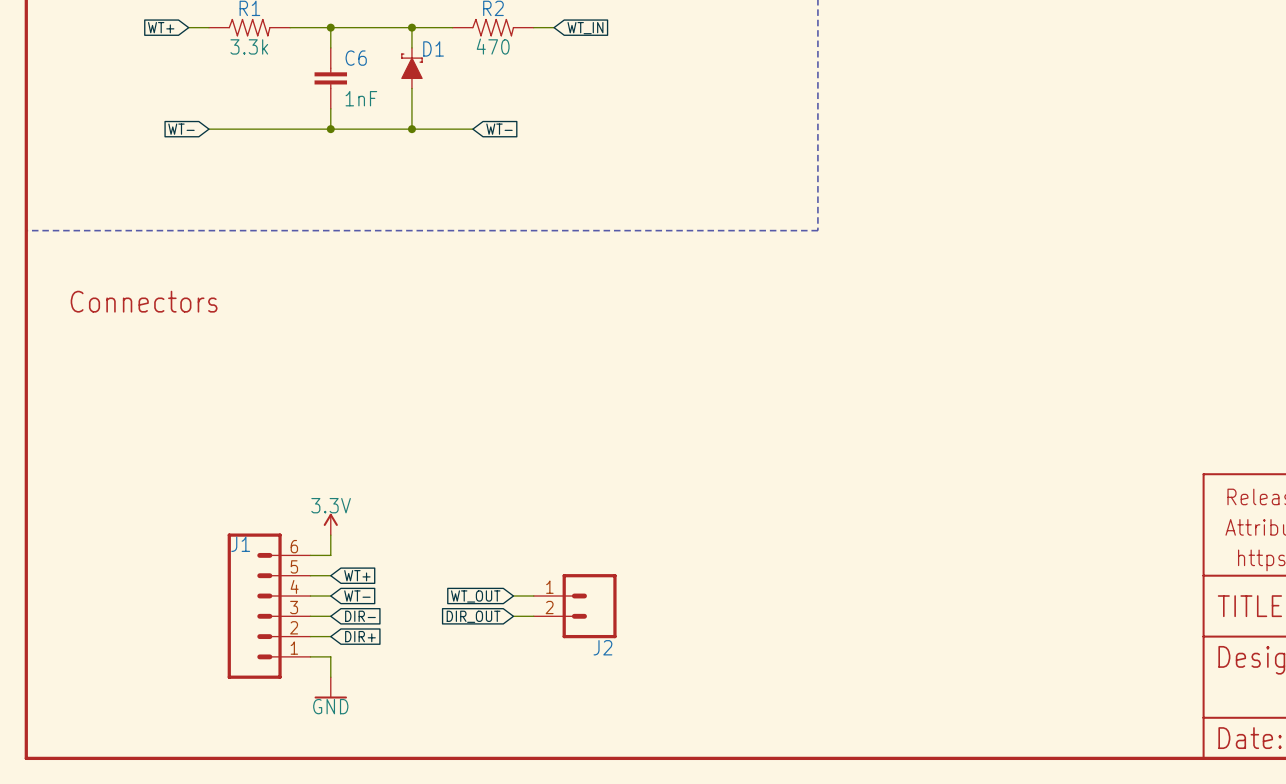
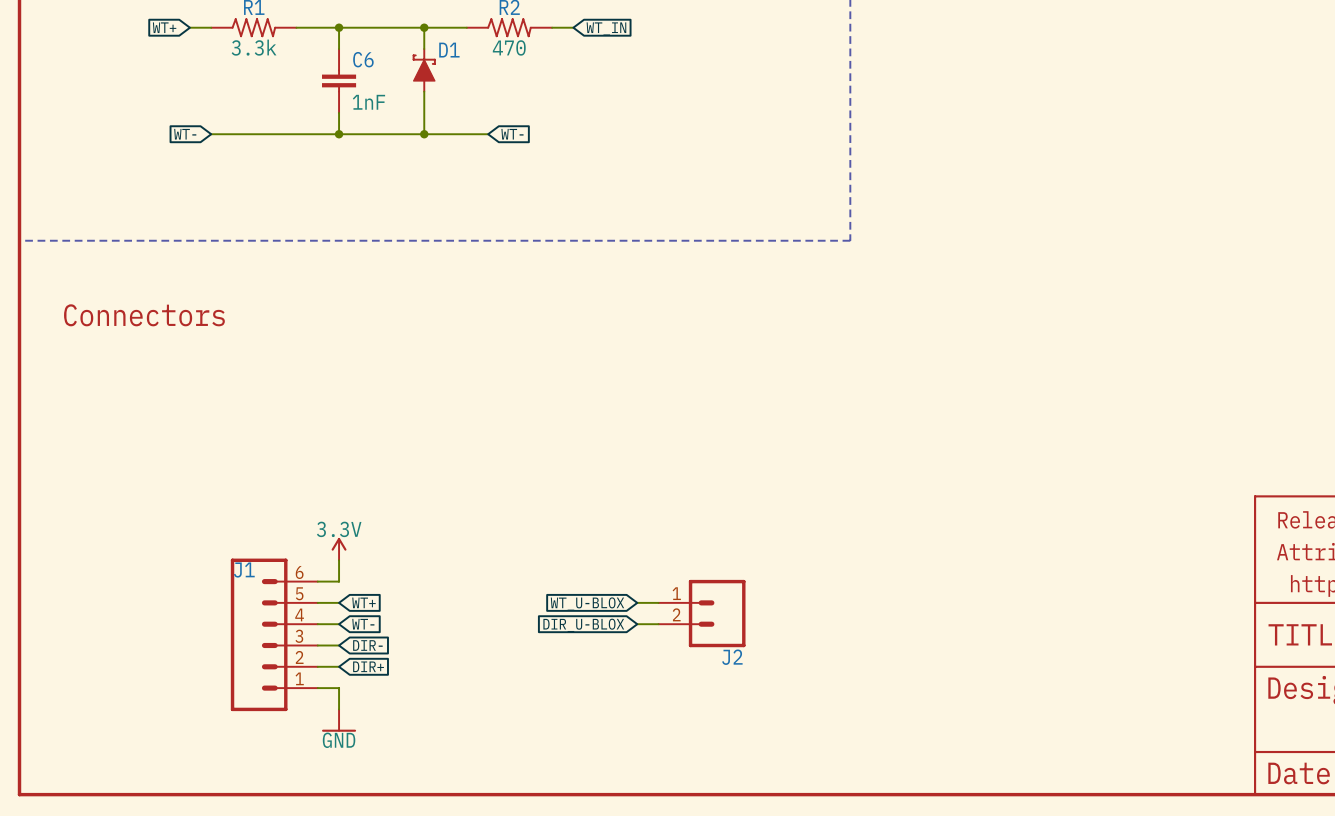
global label: none -> WT_U-BLOX (587, 604)
global label: WT_OUT (475, 596) -> none
wire: (513, 596) (533, 596) -> (637, 624) (658, 624)
global label: none -> DIR_U-BLOX (583, 625)
J2 position: (575, 606) -> (702, 613)
global label: DIR_OUT (473, 616) -> none
wire: (513, 616) (533, 616) -> (637, 602) (658, 602)

